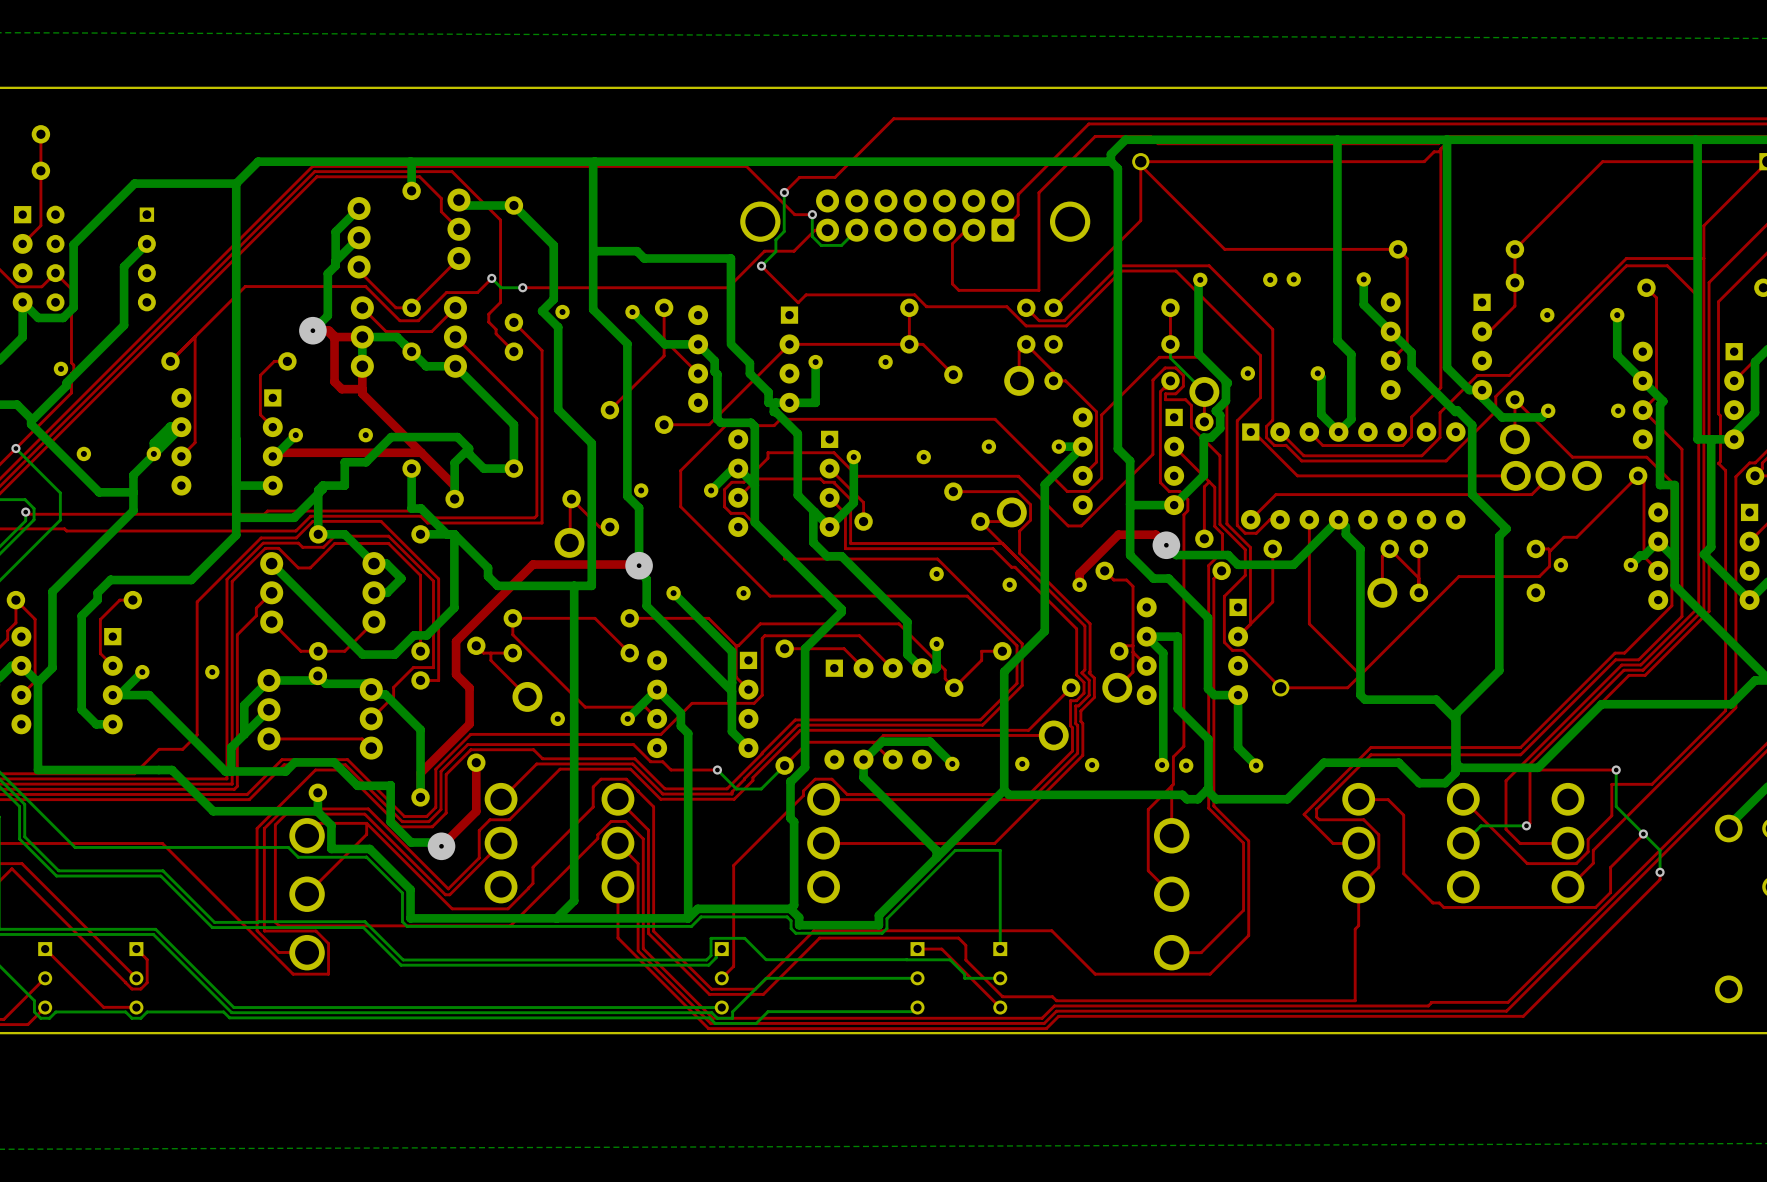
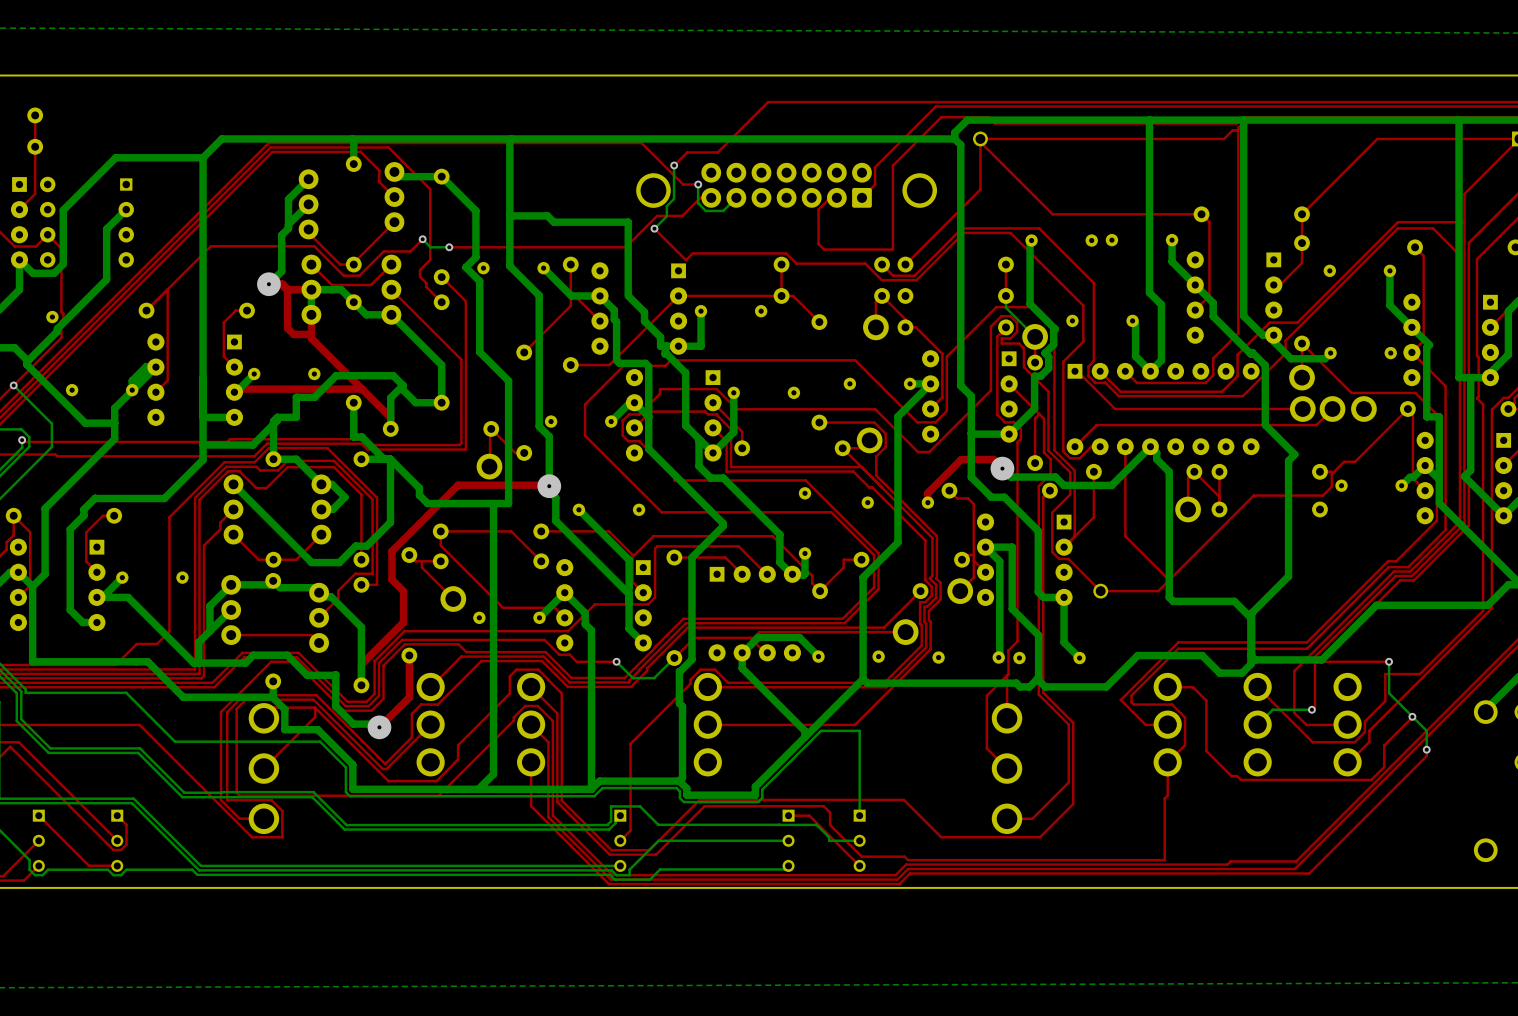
bottom track: (29, 802) (75, 847) (288, 847) (298, 857) (366, 857) (372, 862) -> (25, 689) (25, 692) (126, 692) (175, 741) (320, 741)

